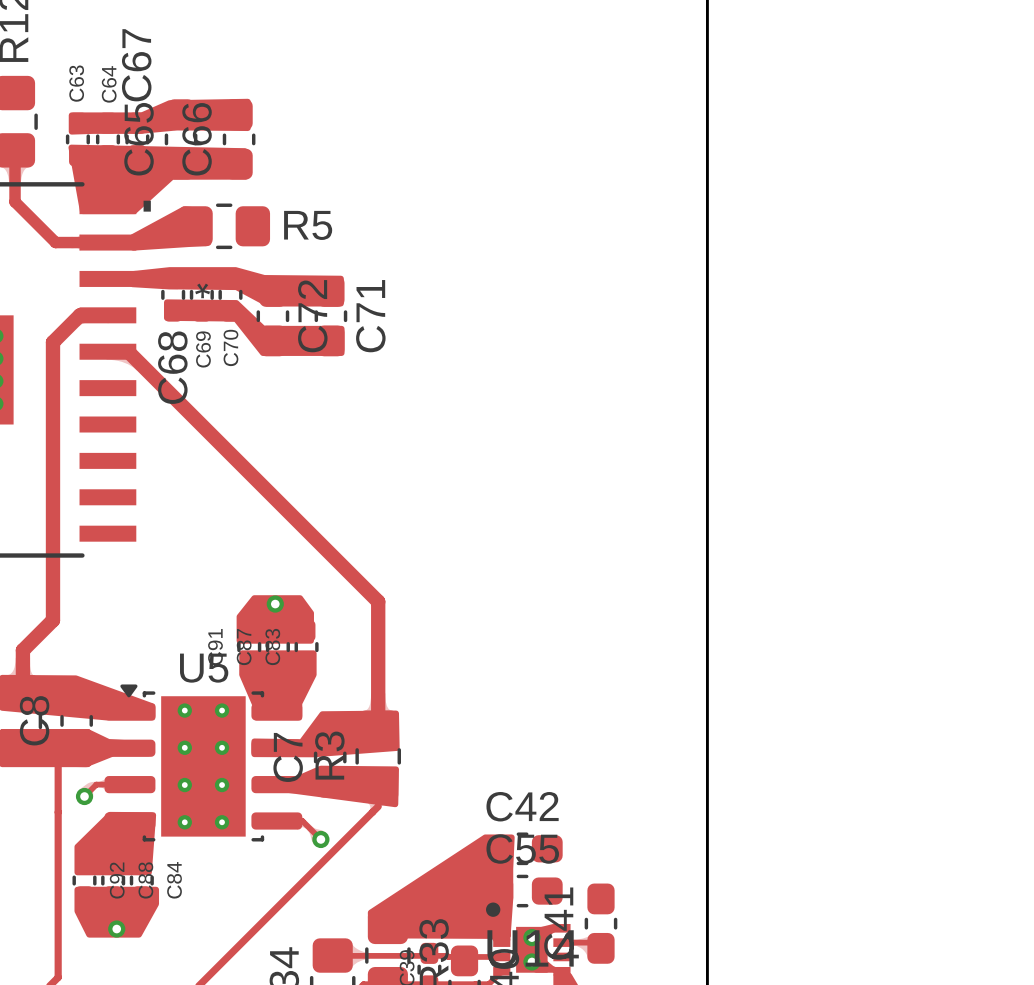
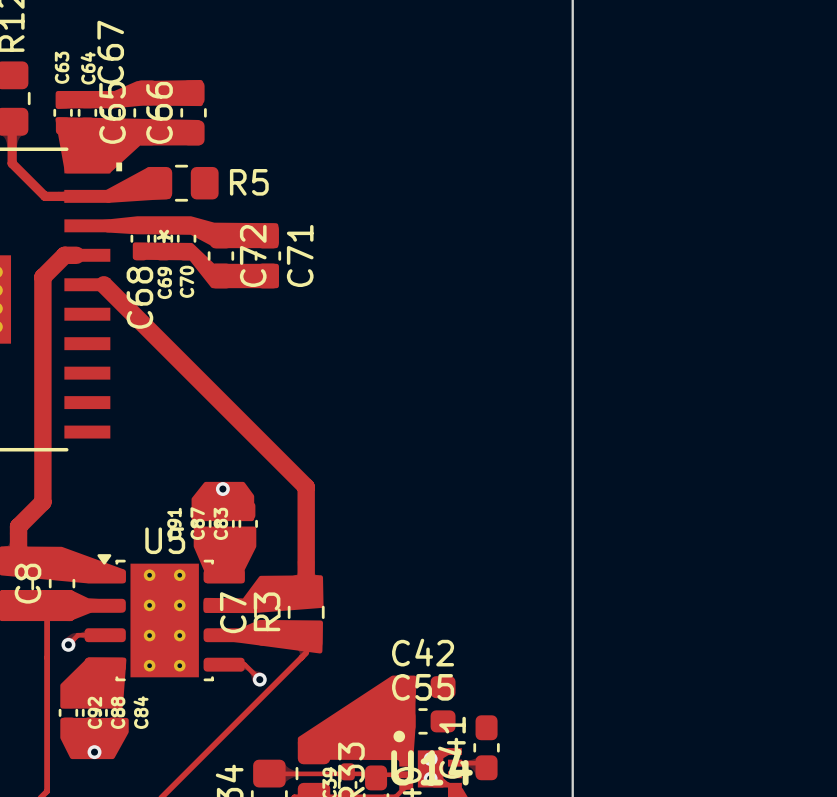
top track width: thin (94, 315) (80, 315) (52, 342) (52, 620) (22, 650) (22, 688) -> thick (76, 255) (64, 255) (42, 277) (42, 502) (18, 526) (18, 557)
top track width: thin (128, 351) (378, 601) (378, 727) -> thick (103, 284) (306, 487) (306, 589)

